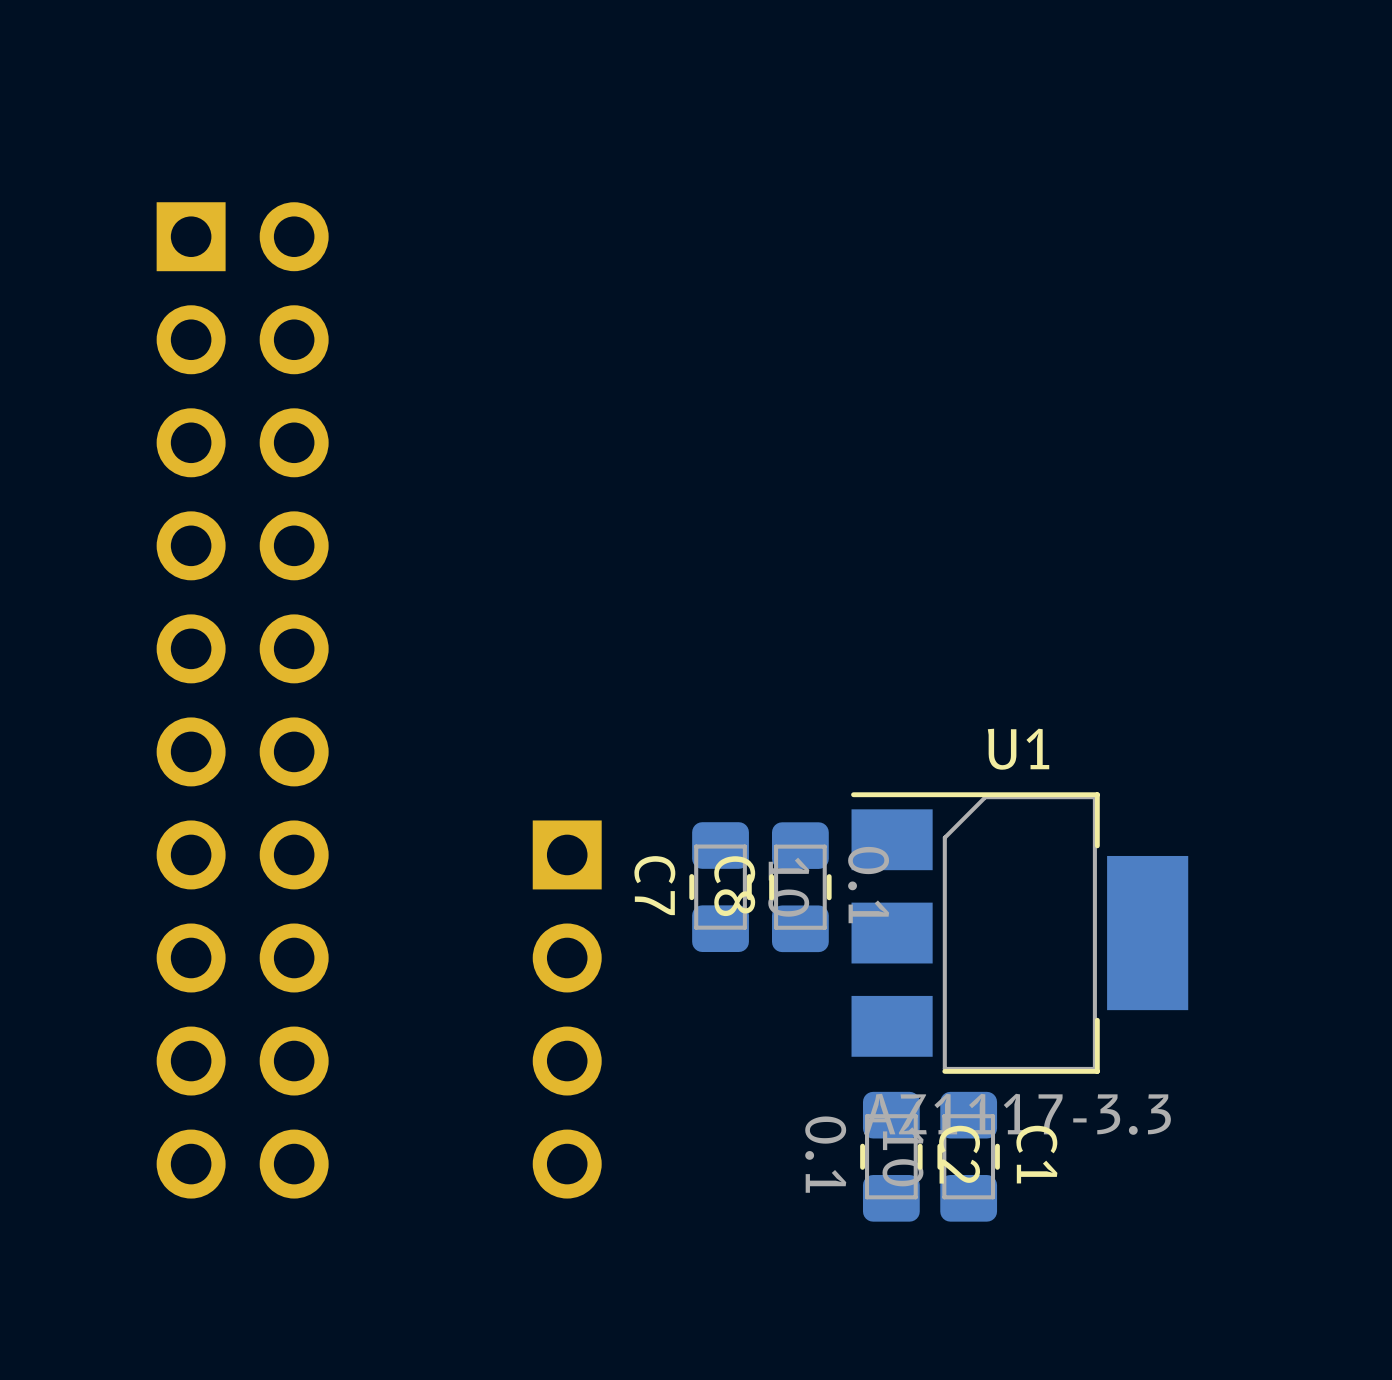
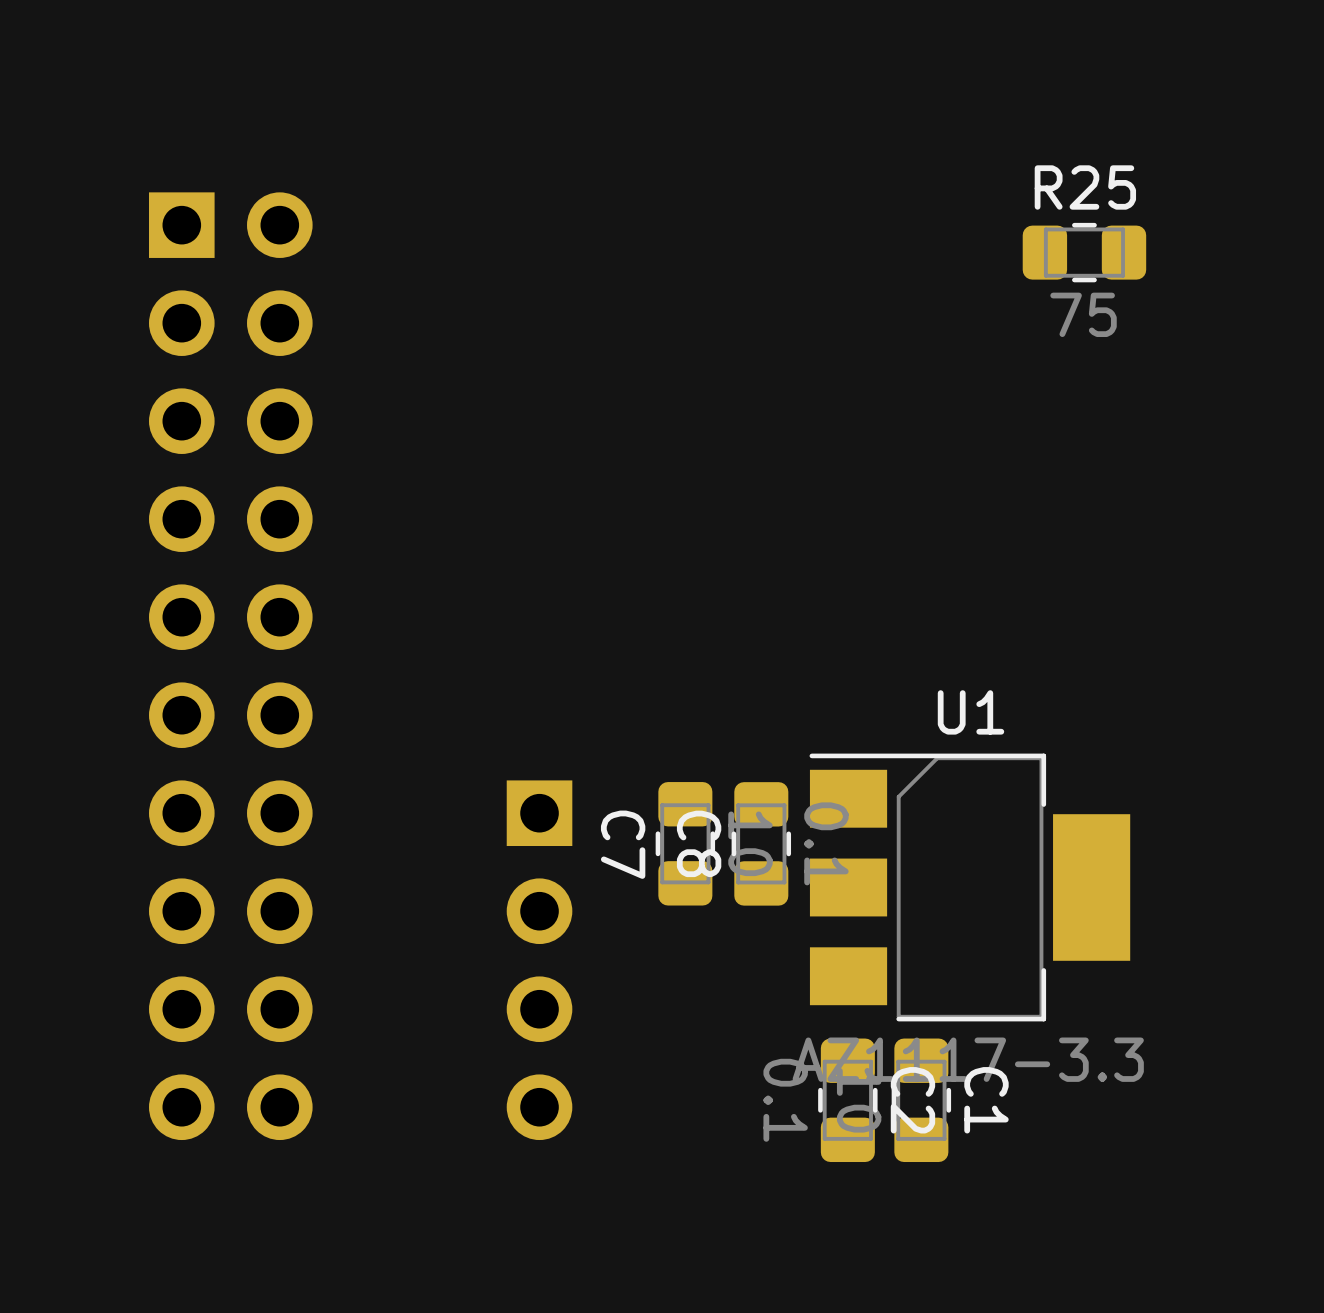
R25: none -> 75 (1084, 252)

